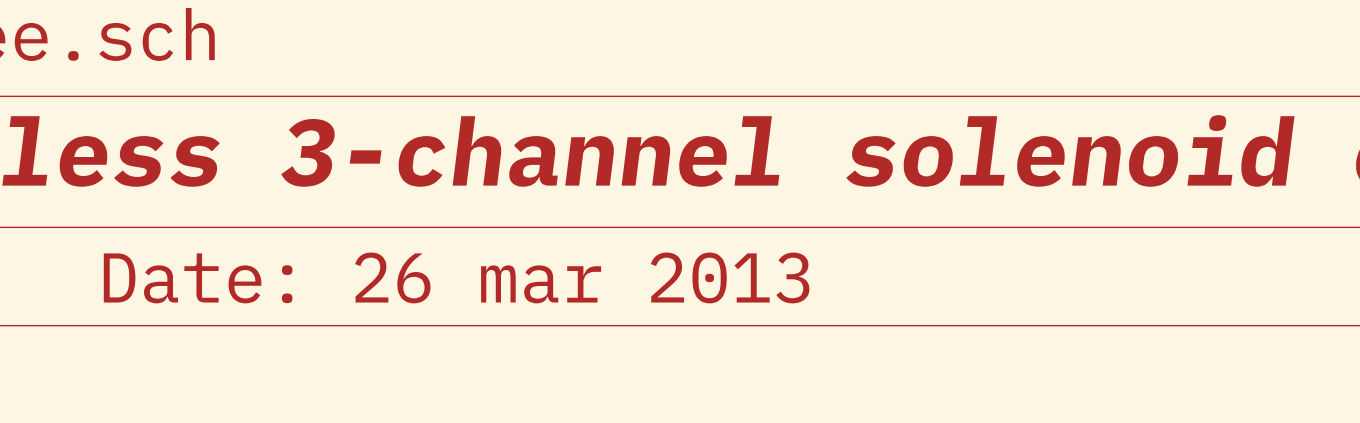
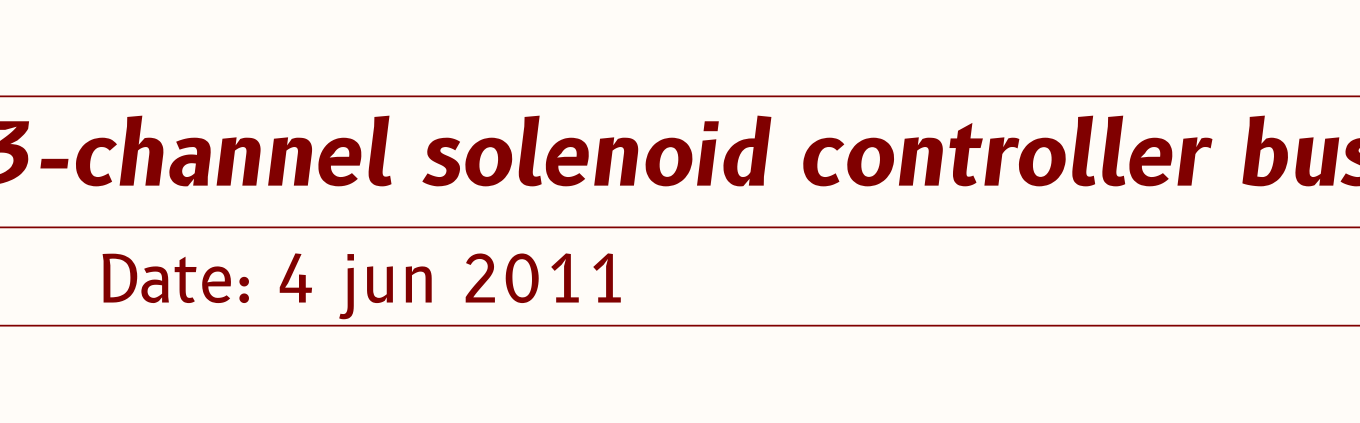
title block: Date: 26 mar 2013 (456, 277) -> Date: 4 jun 2011 (361, 286)

